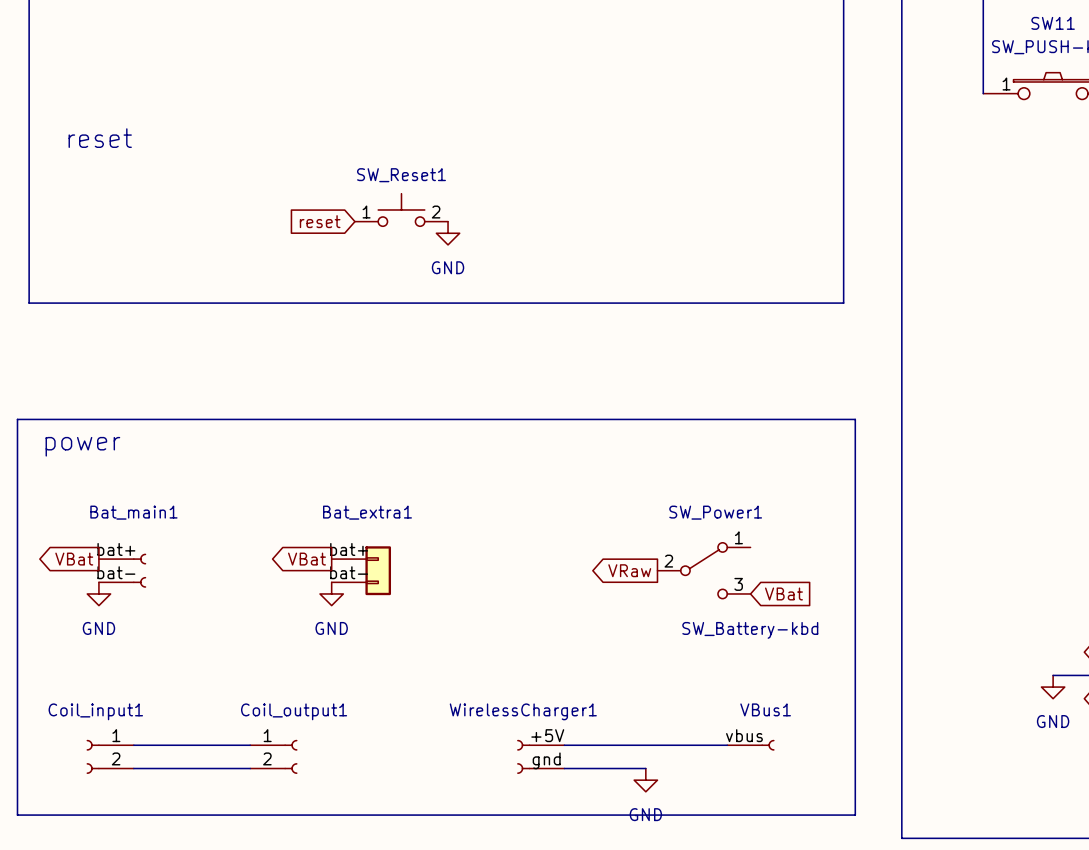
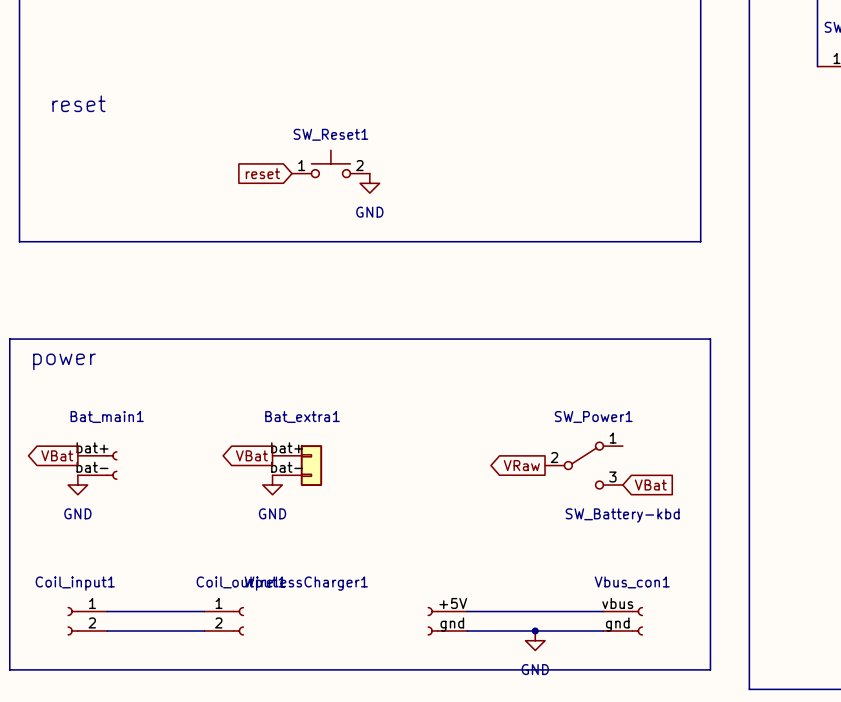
WirelessCharger1 name position: WirelessCharger1 (523, 711) -> WirelessCharger1 (306, 583)
VBus1: (750, 745) -> none
Vbus_con1: none -> (623, 621)
wire: none -> (535, 630) (603, 630)
junction: none -> (535, 630)

